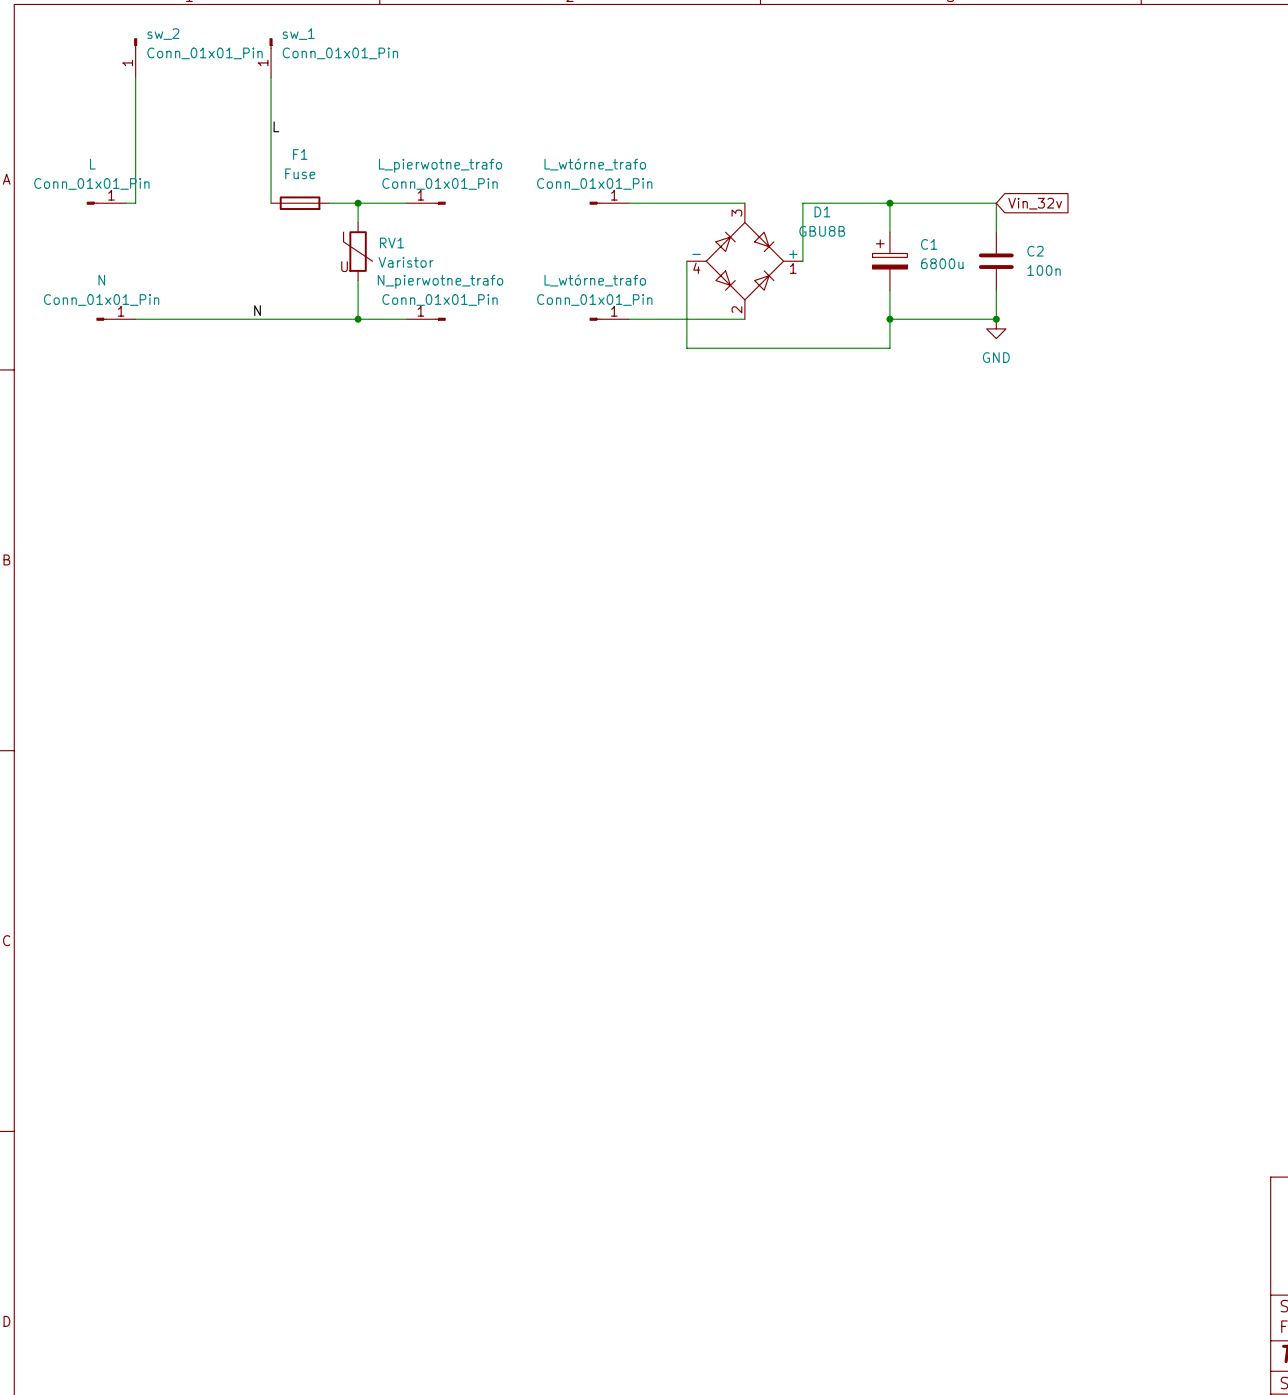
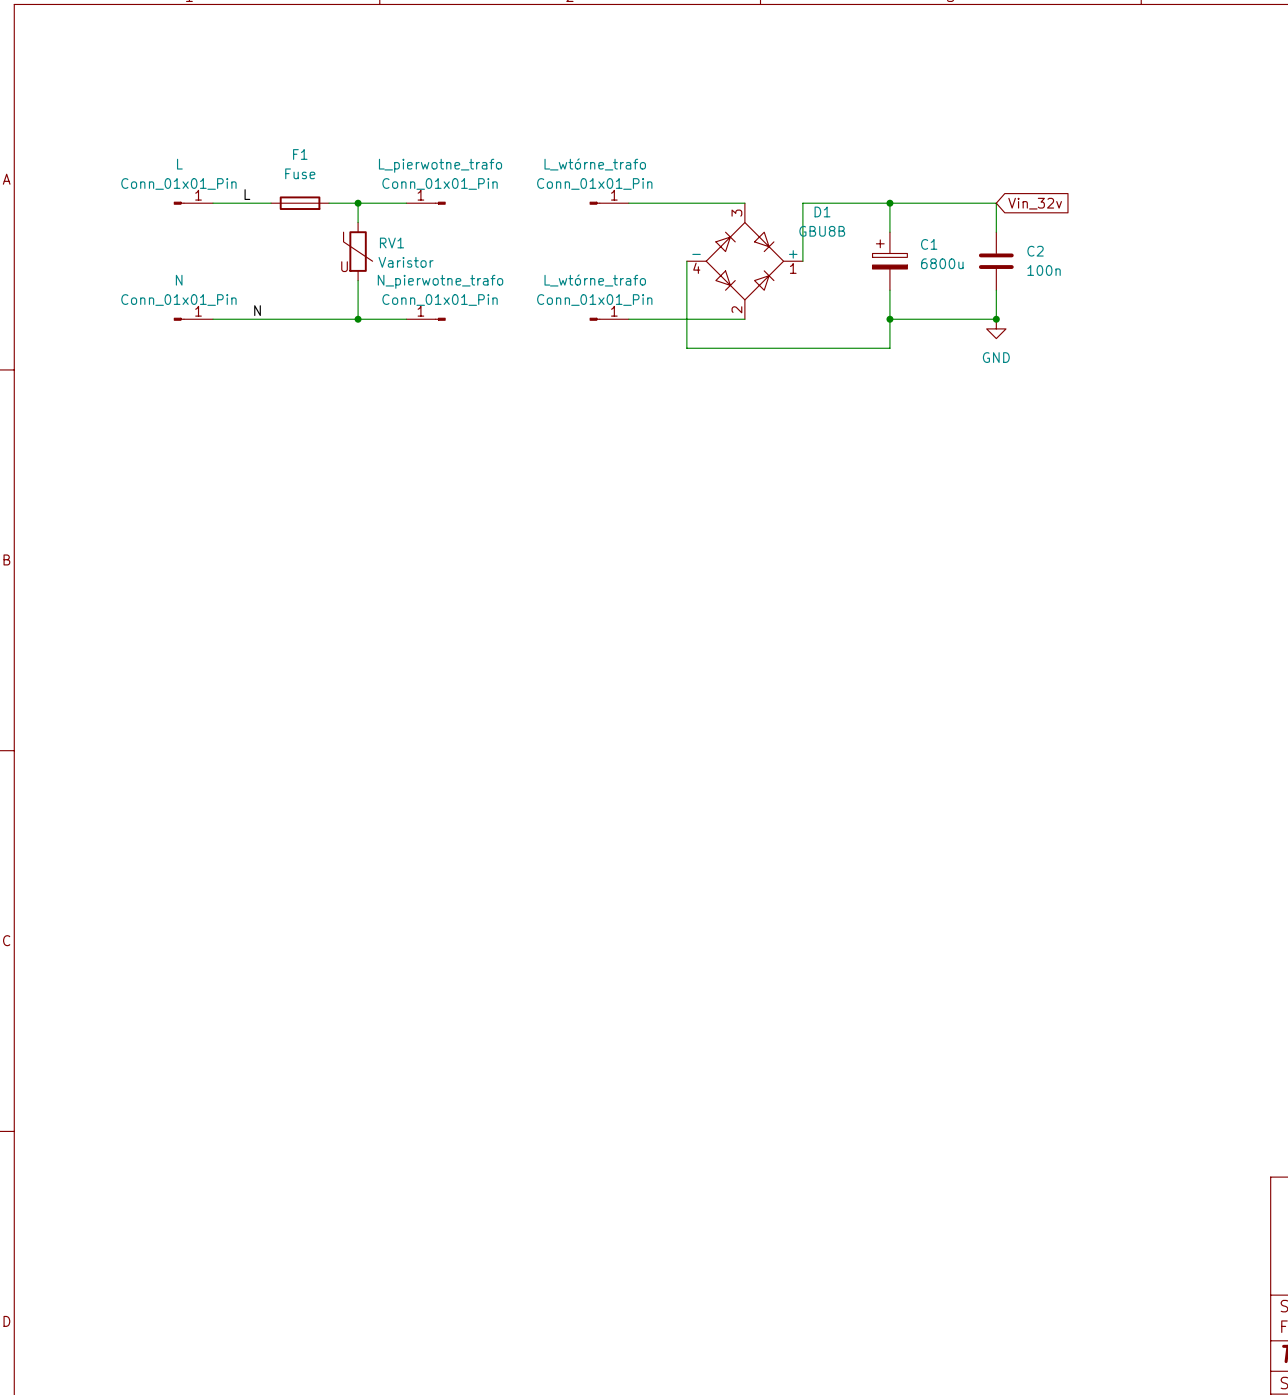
sw_2: Conn_01x01_Pin (135, 57) -> none
sw_1: Conn_01x01_Pin (271, 57) -> none
wire: (135, 77) (135, 203) (125, 203) -> none
wire: (271, 77) (271, 203) -> (213, 203) (271, 203)
label position: L (276, 126) -> L (247, 194)
L position: (106, 203) -> (193, 203)
N position: (116, 319) -> (193, 319)
wire: (135, 319) (213, 319) -> none

